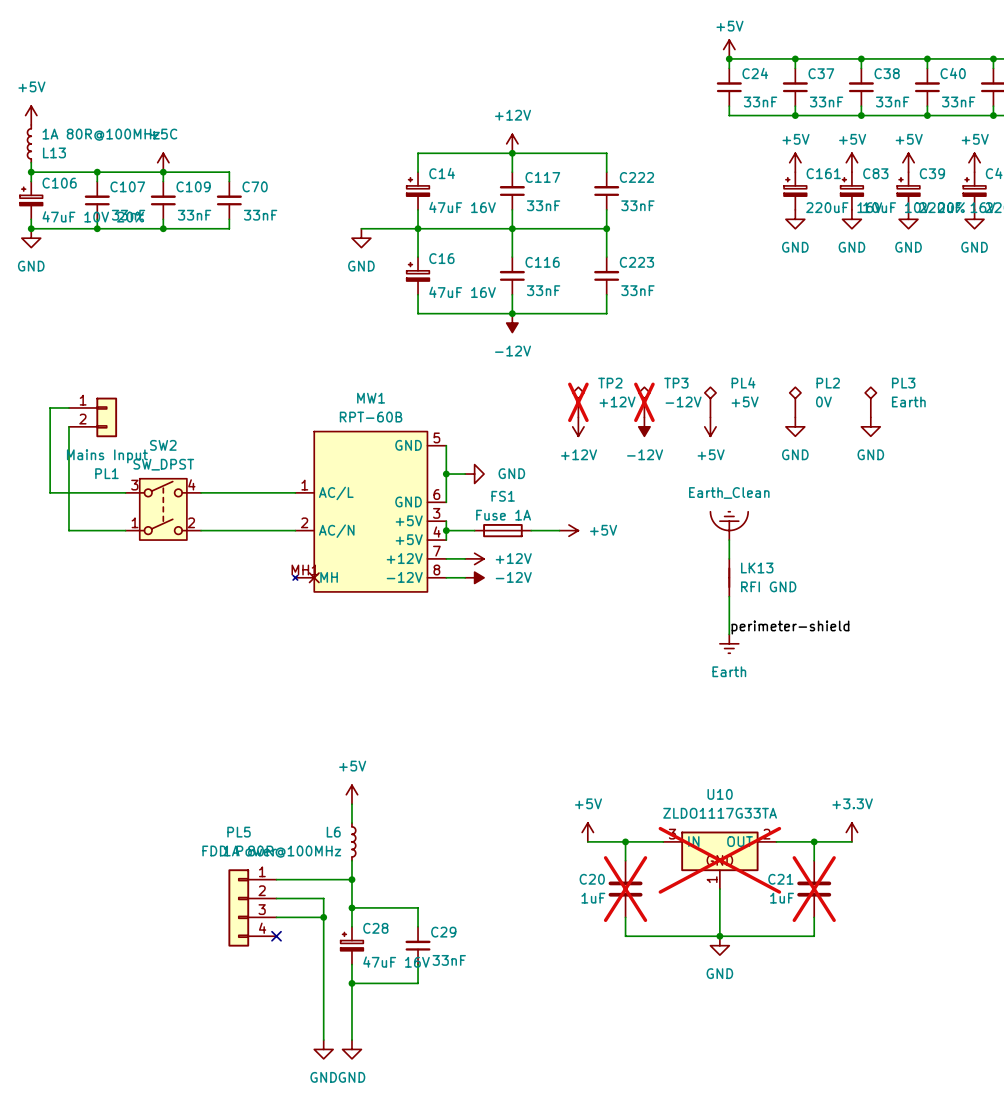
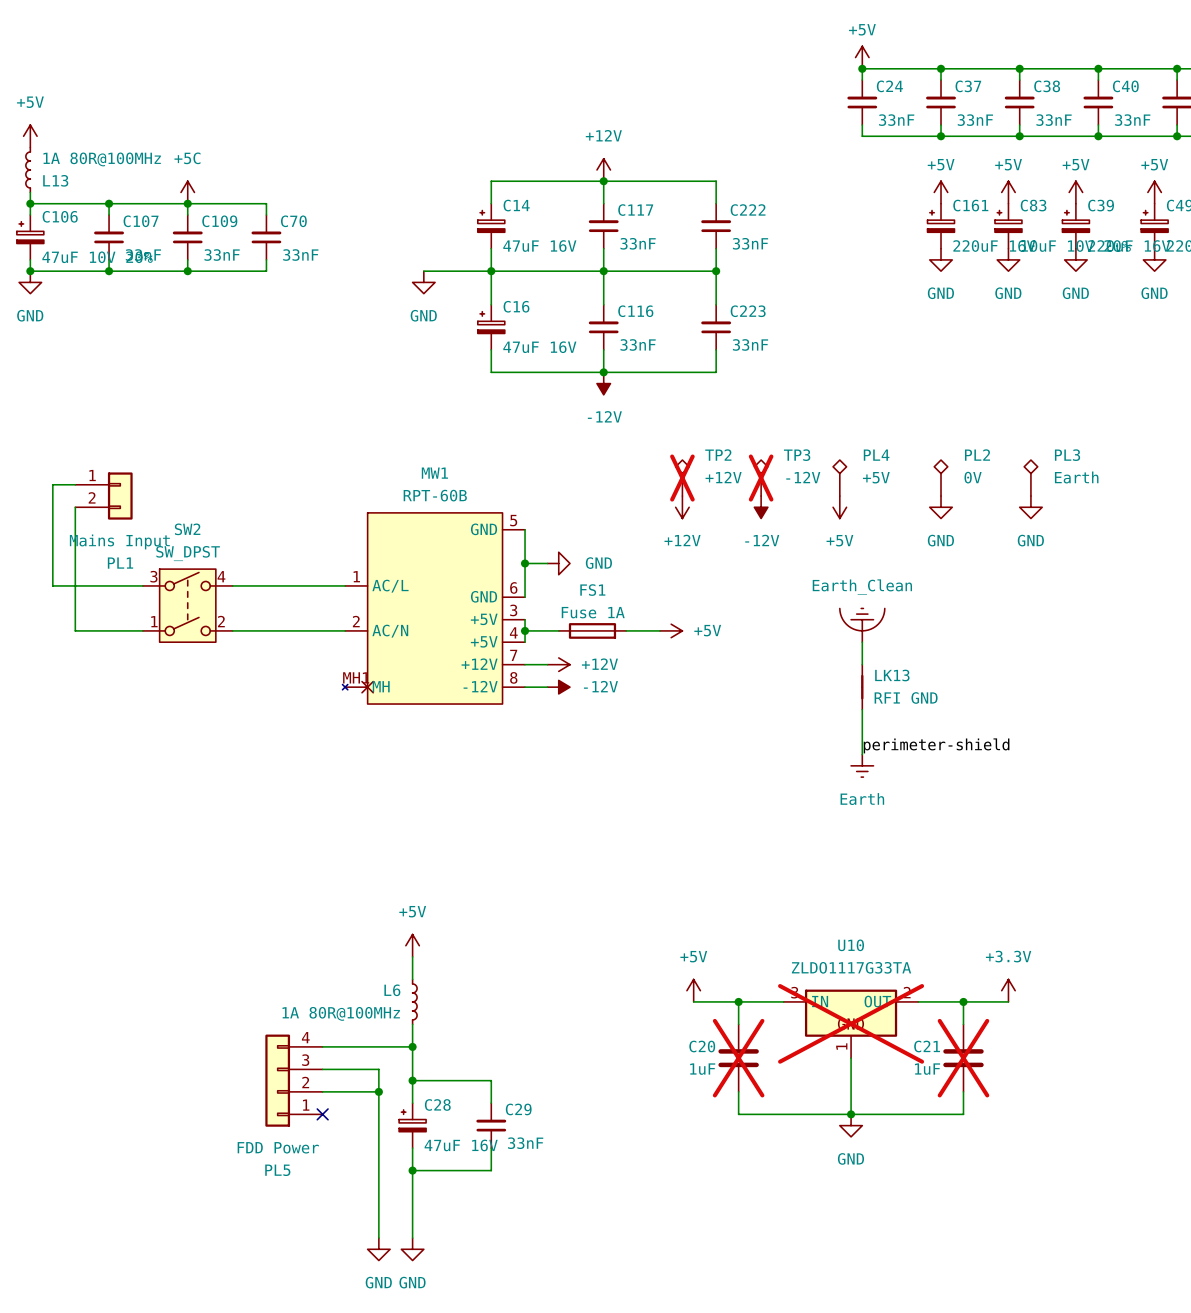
PL5 flip: as is (238, 907) -> up-down (277, 1080)

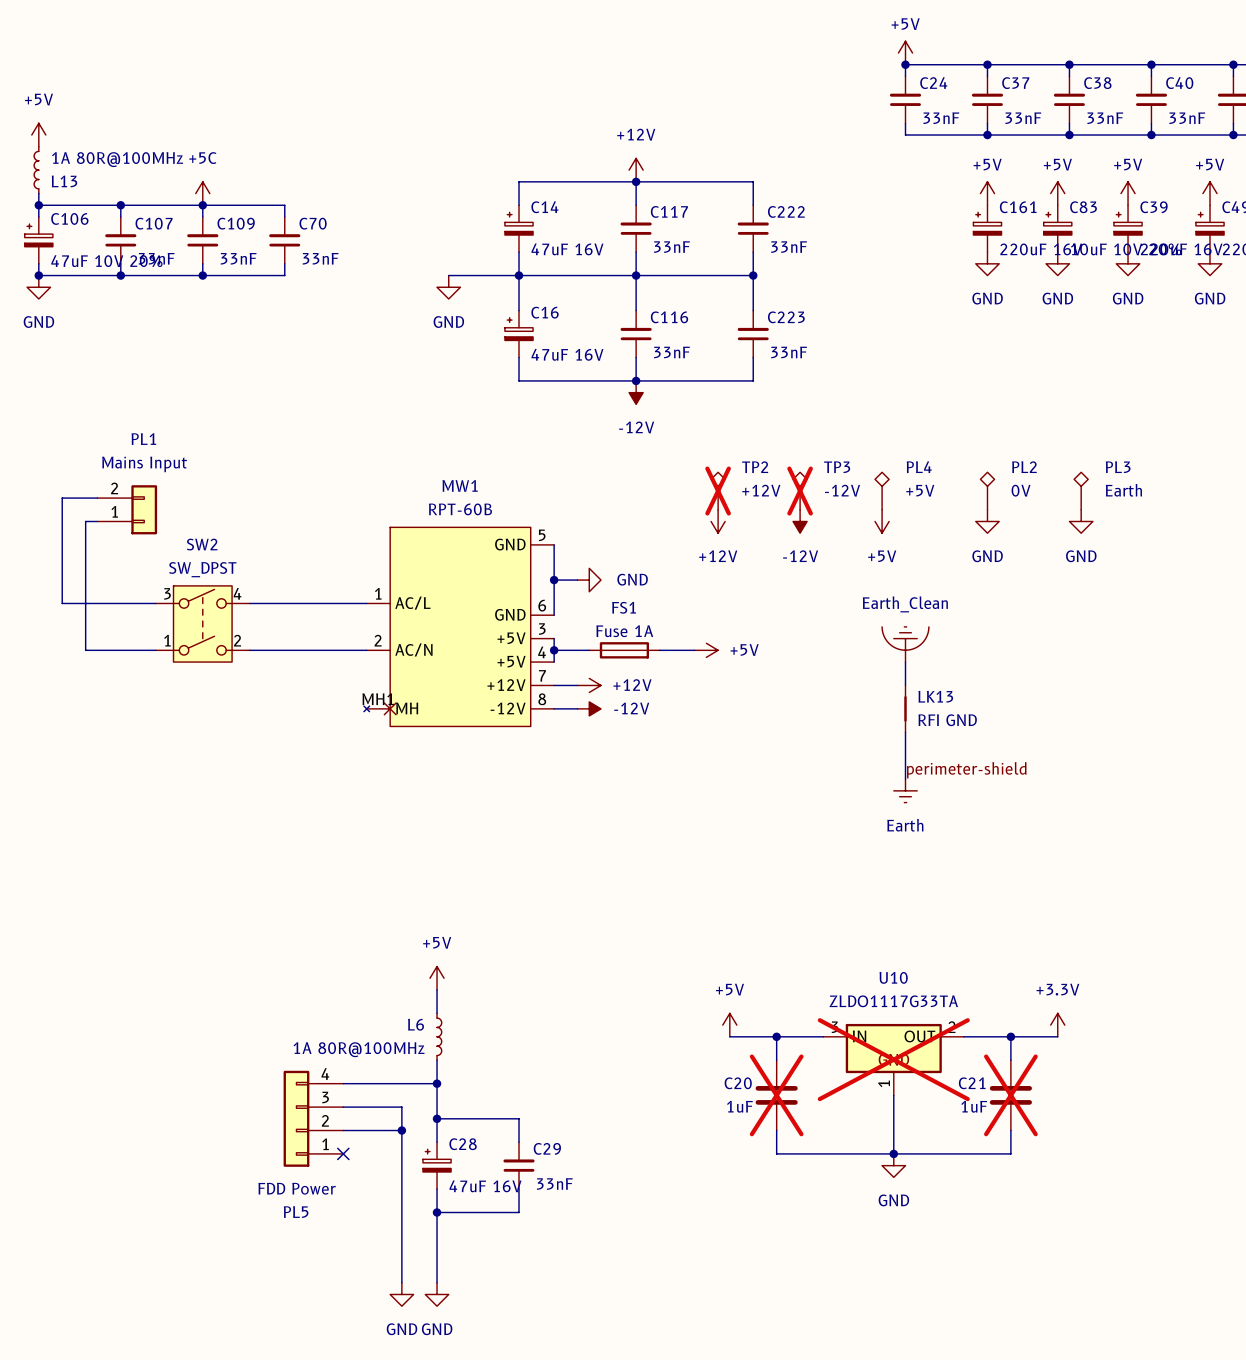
PL1 flip: as is (120, 496) -> up-down (144, 509)

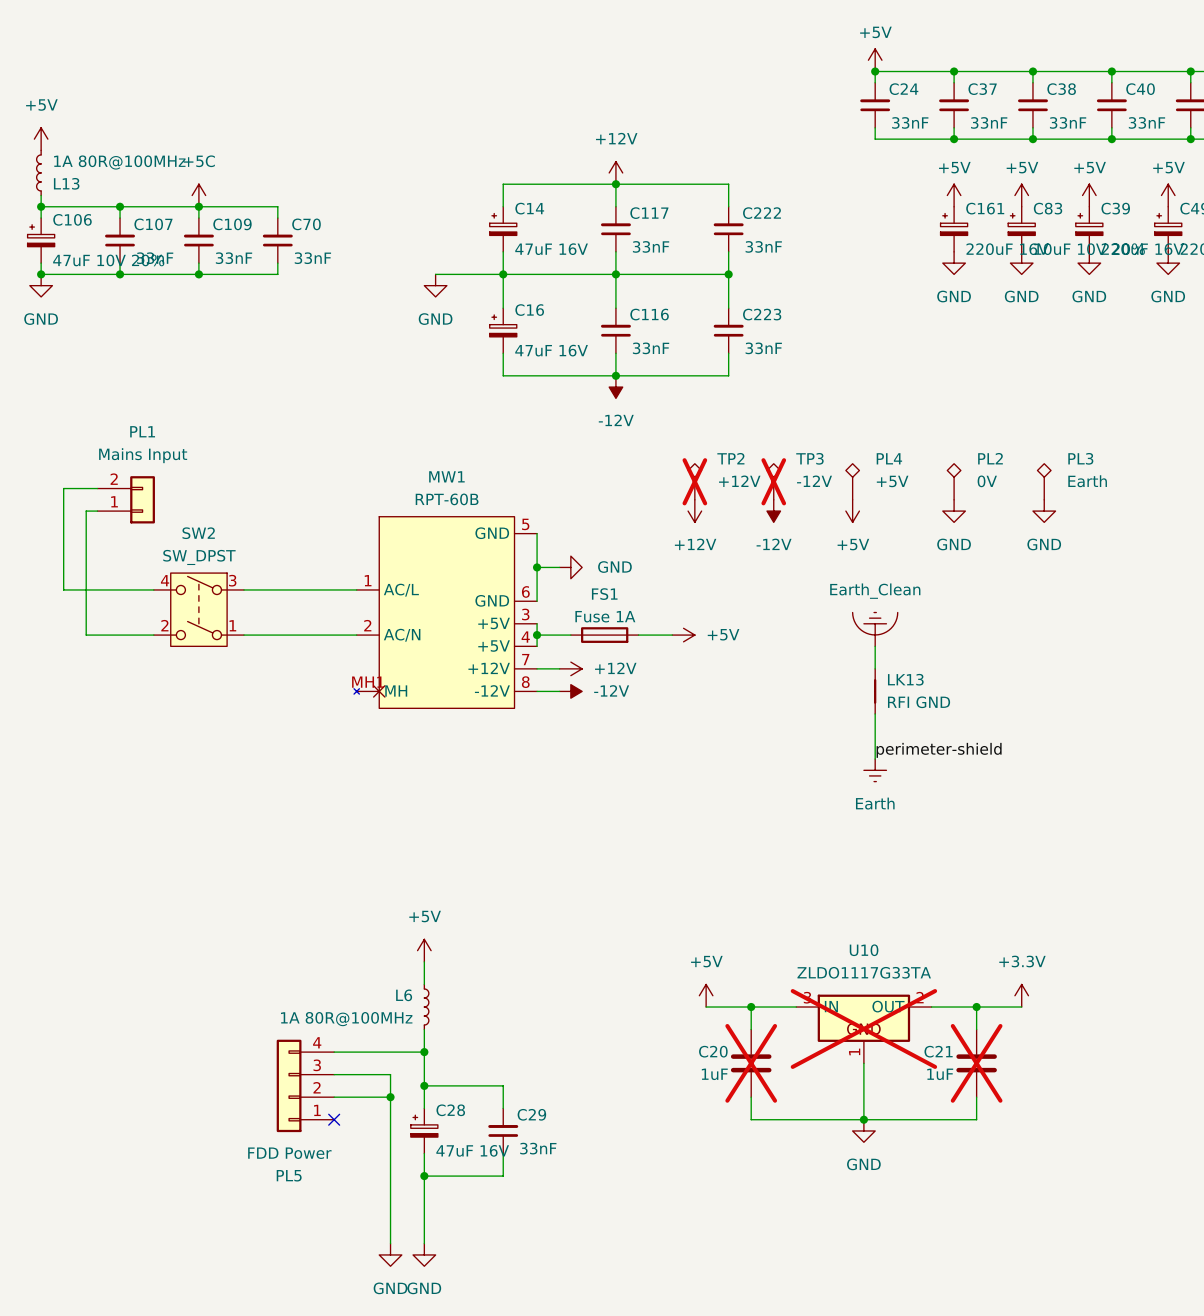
SW2 flip: as is (202, 623) -> left-right (198, 609)

